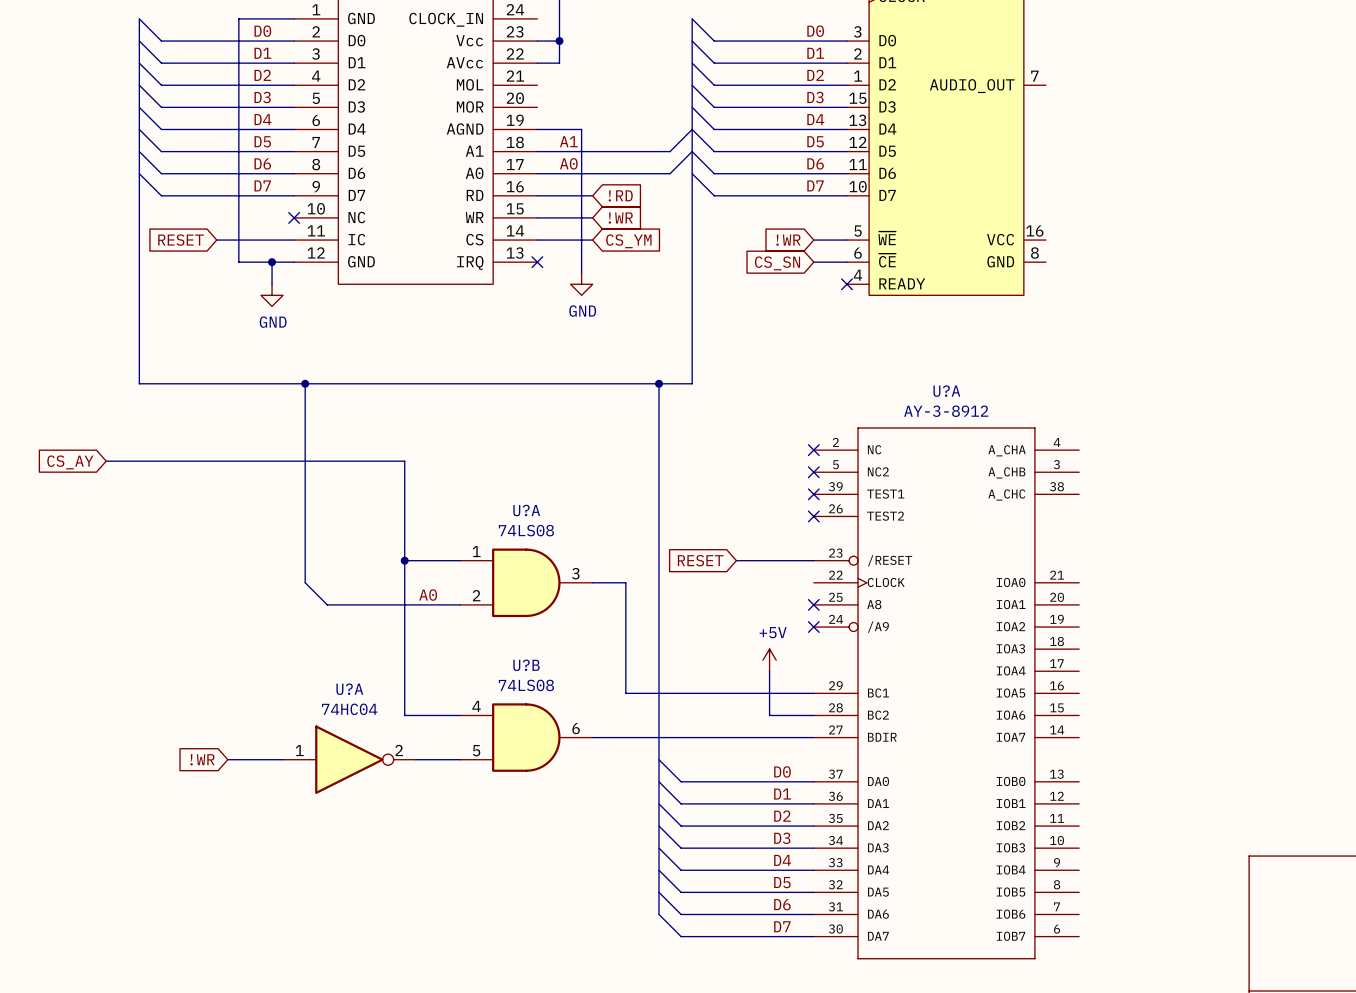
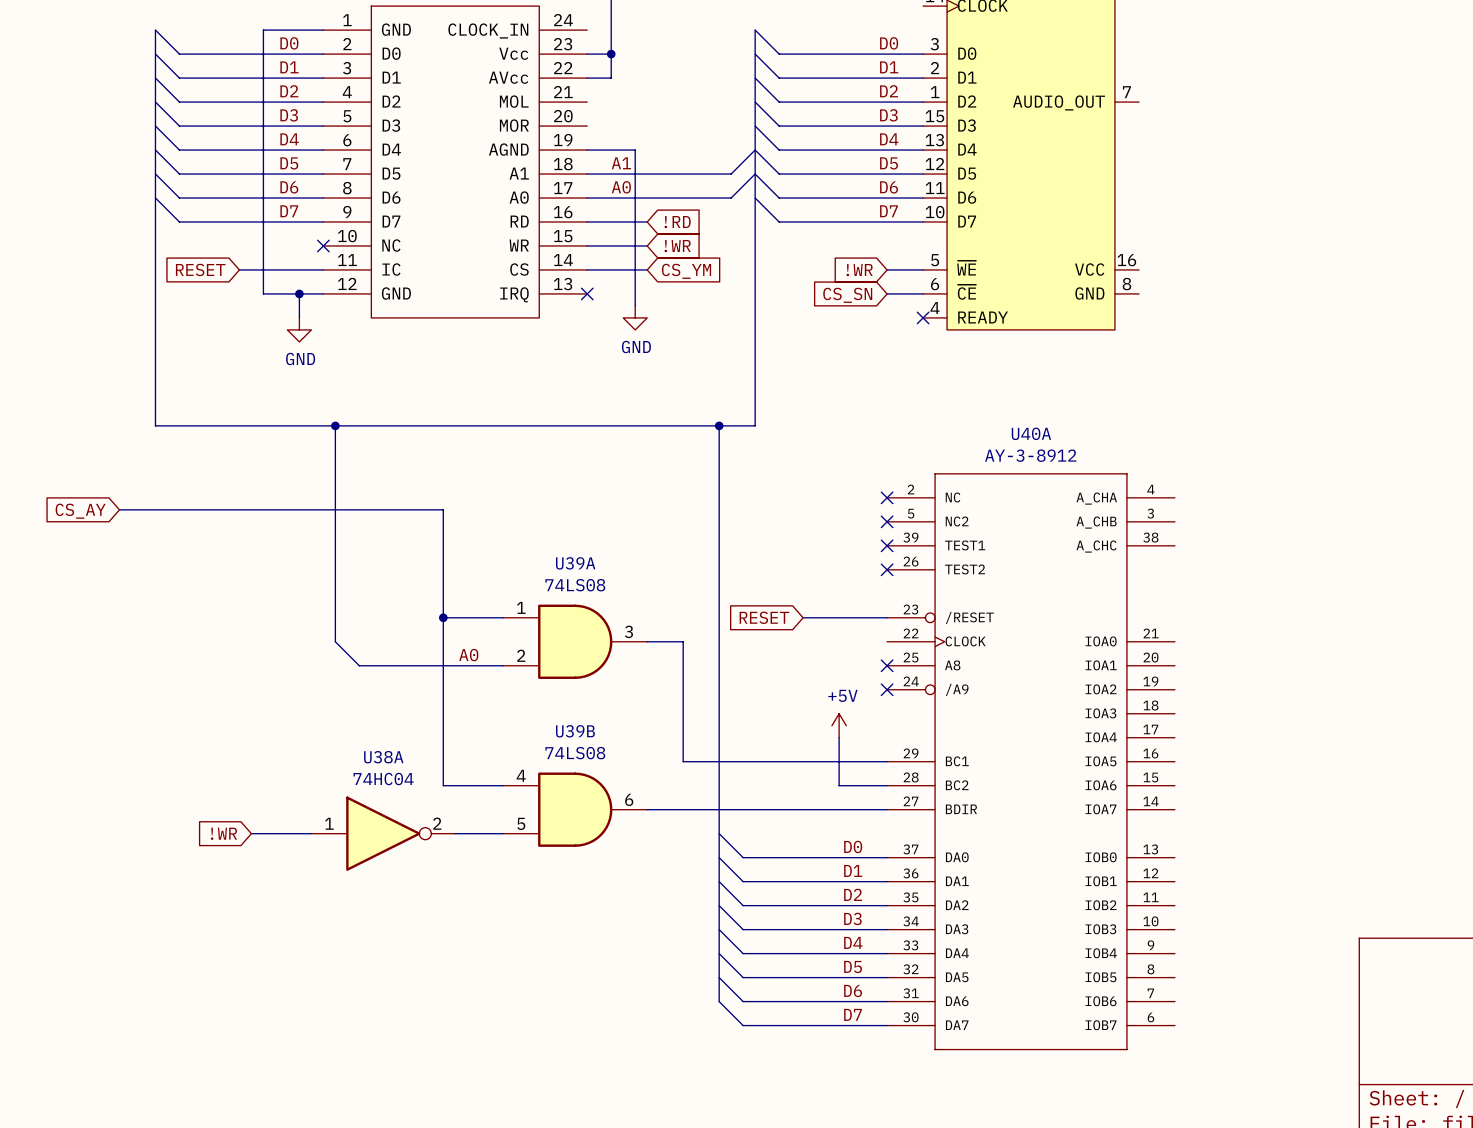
U?A name: U?A (946, 391) -> U40A (1031, 433)
U?A name: U?A (526, 510) -> U39A (575, 563)
U?B name: U?B (526, 665) -> U39B (575, 731)
U?A name: U?A (349, 689) -> U38A (383, 757)

